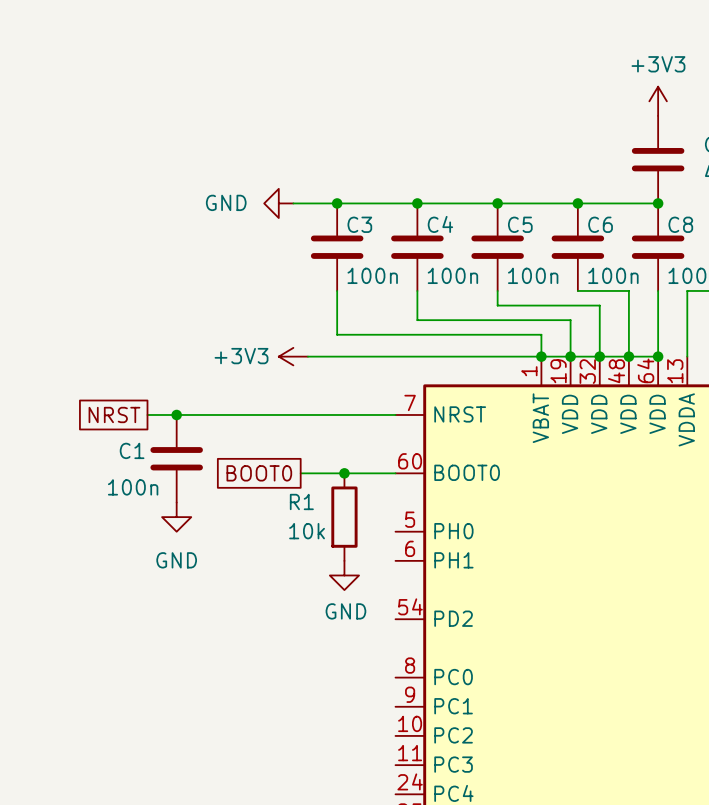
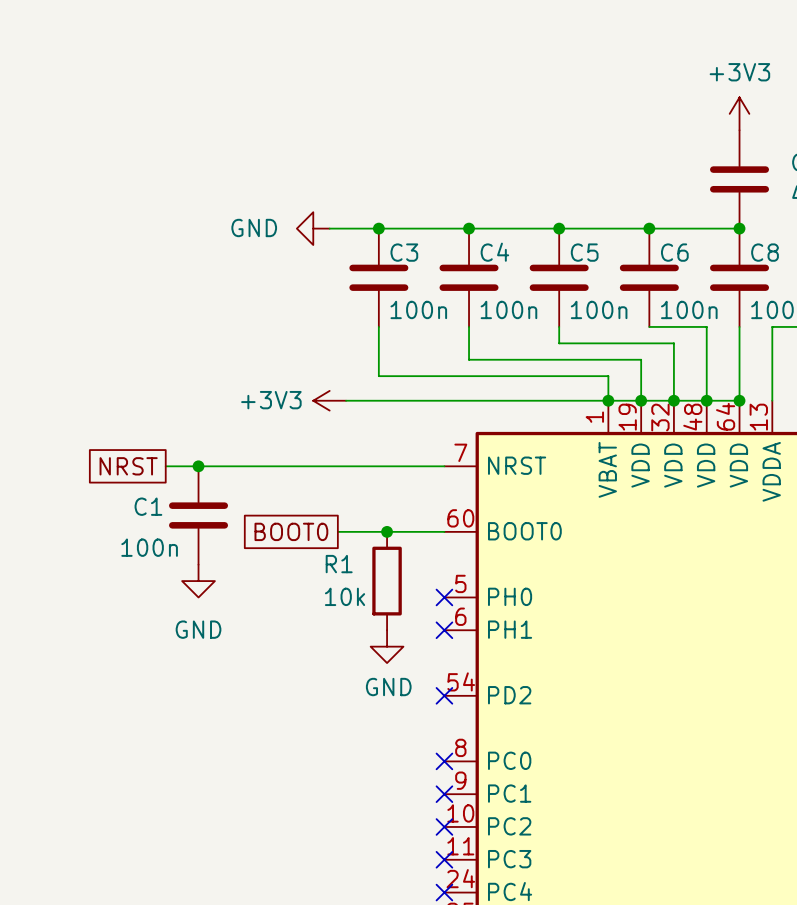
no-connect mark: none -> (444, 597)
no-connect mark: none -> (444, 630)
no-connect mark: none -> (444, 695)
no-connect mark: none -> (444, 761)
no-connect mark: none -> (444, 794)
no-connect mark: none -> (444, 826)
no-connect mark: none -> (444, 859)
no-connect mark: none -> (444, 892)

